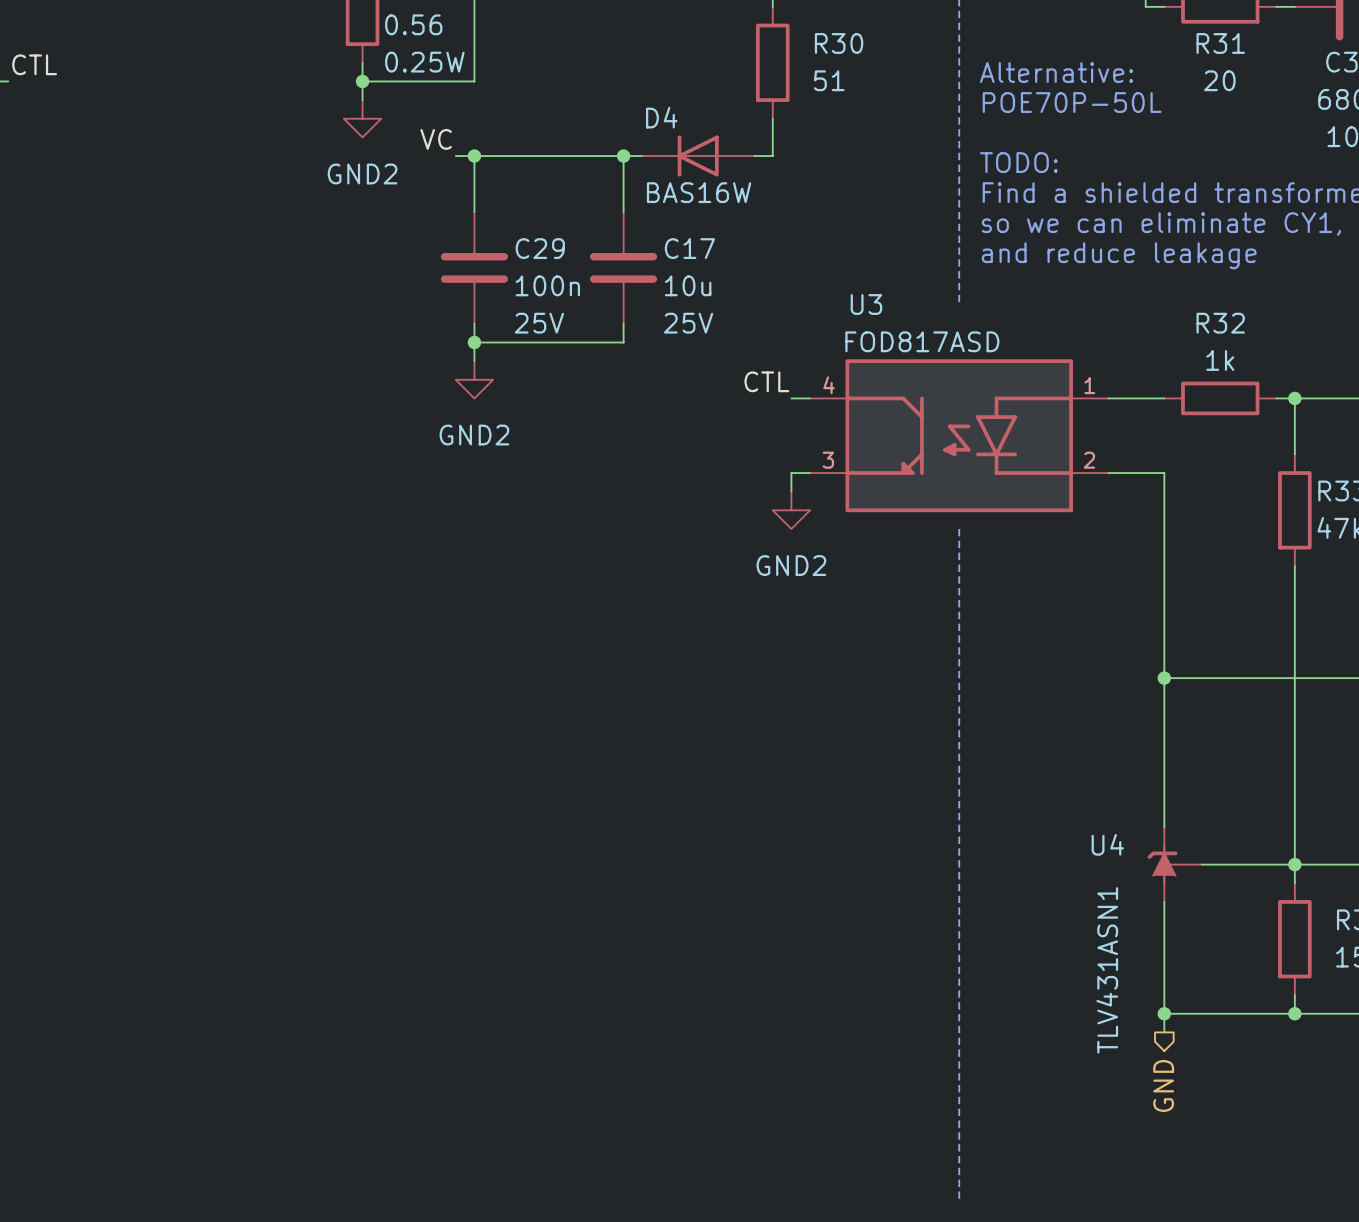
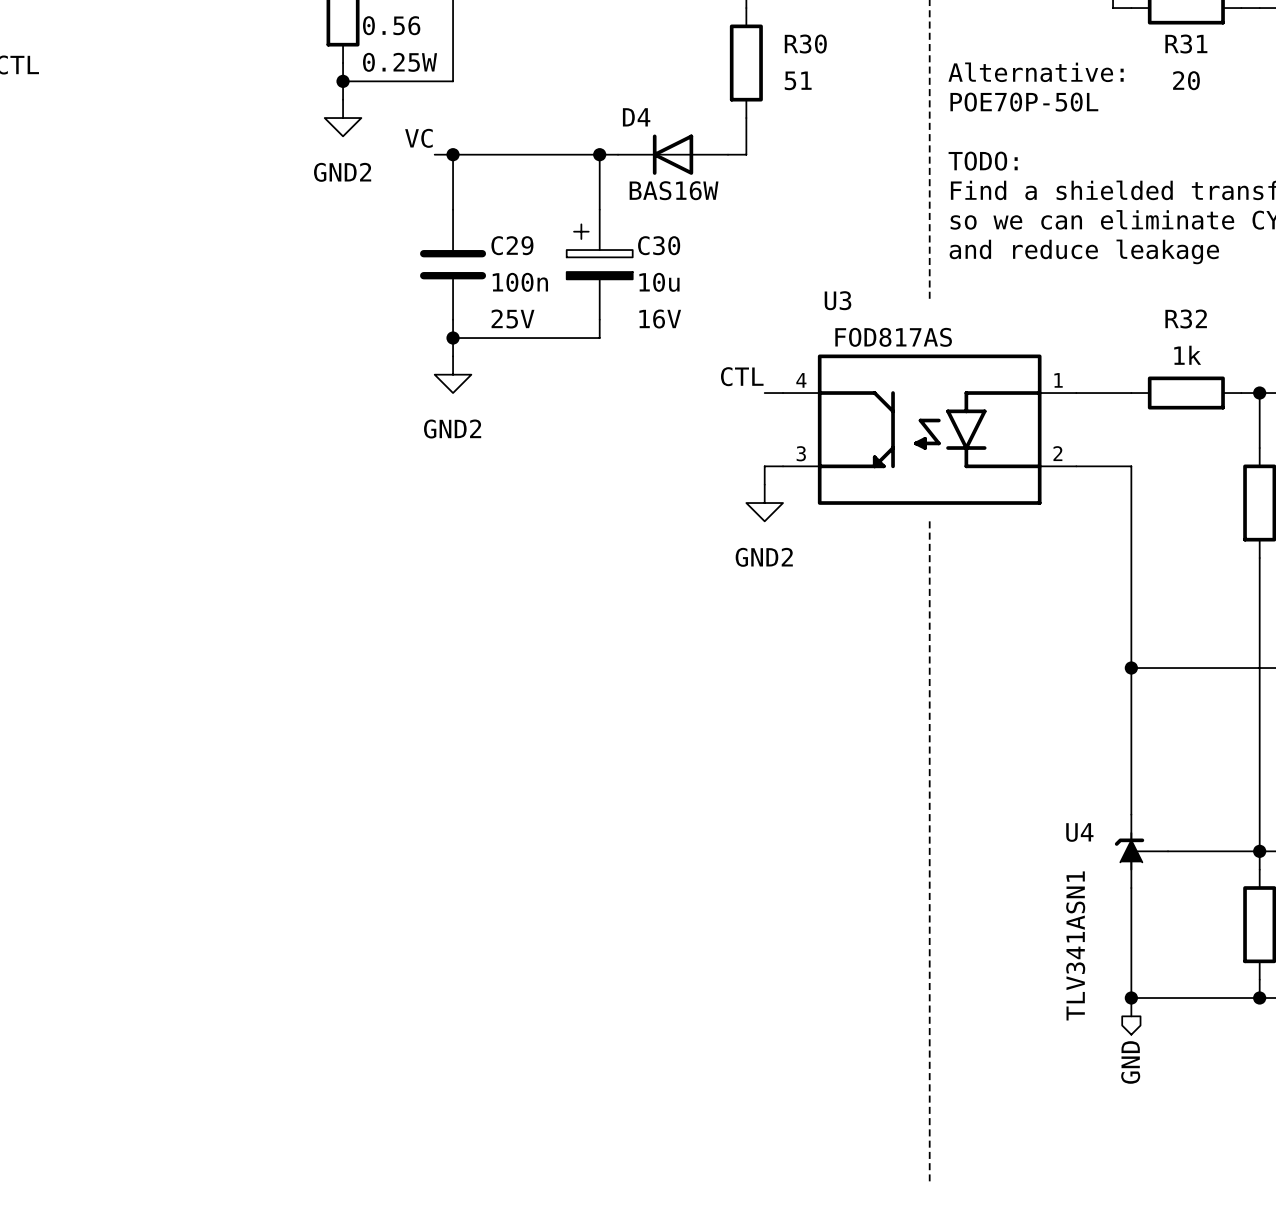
C17: 10u (623, 267) -> none
C30: none -> 10u (599, 264)
U3 value: FOD817ASD (922, 341) -> FOD817AS (893, 337)
U4 value: TLV431ASN1 (1107, 970) -> TLV341ASN1 (1075, 945)

